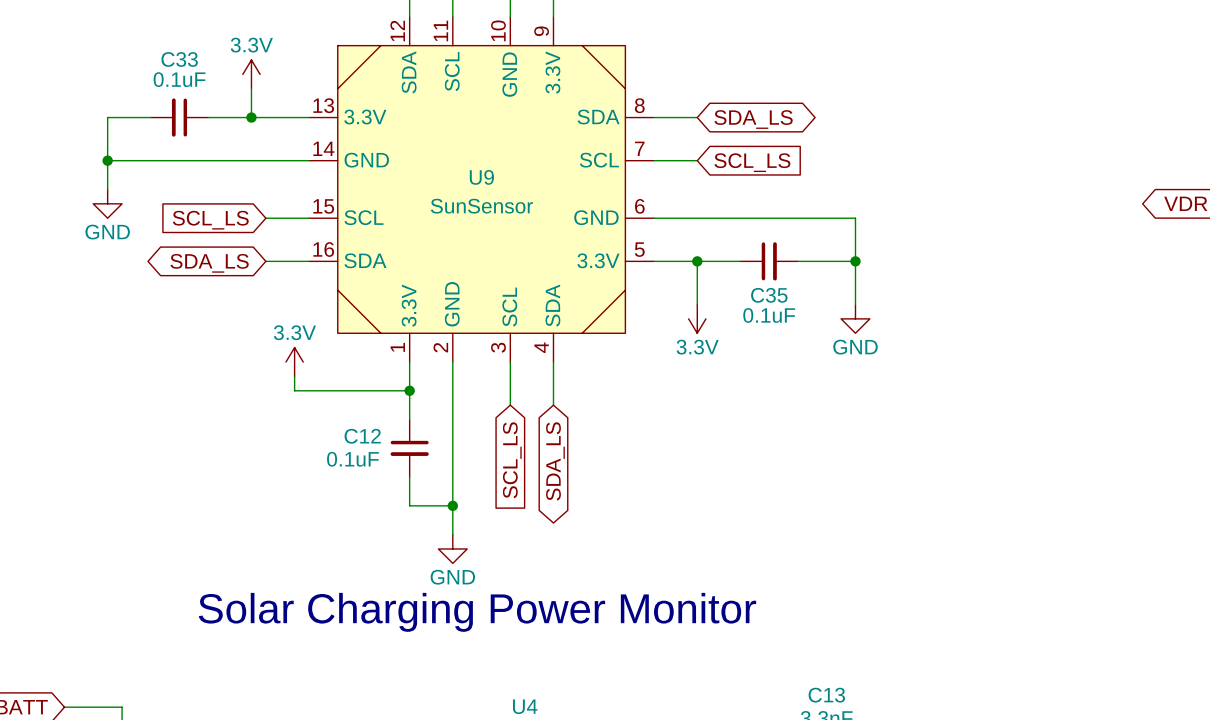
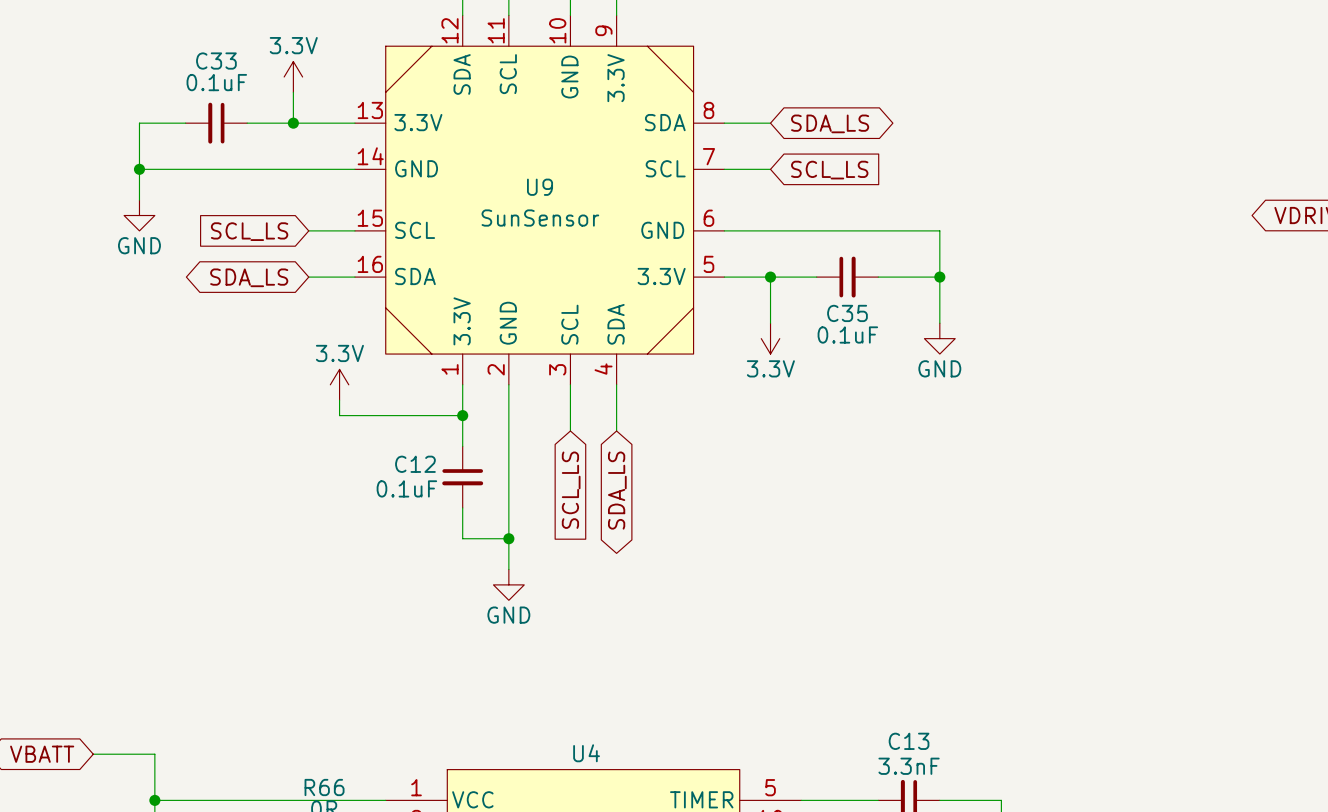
text: Solar Charging Power Monitor (477, 612) -> none

